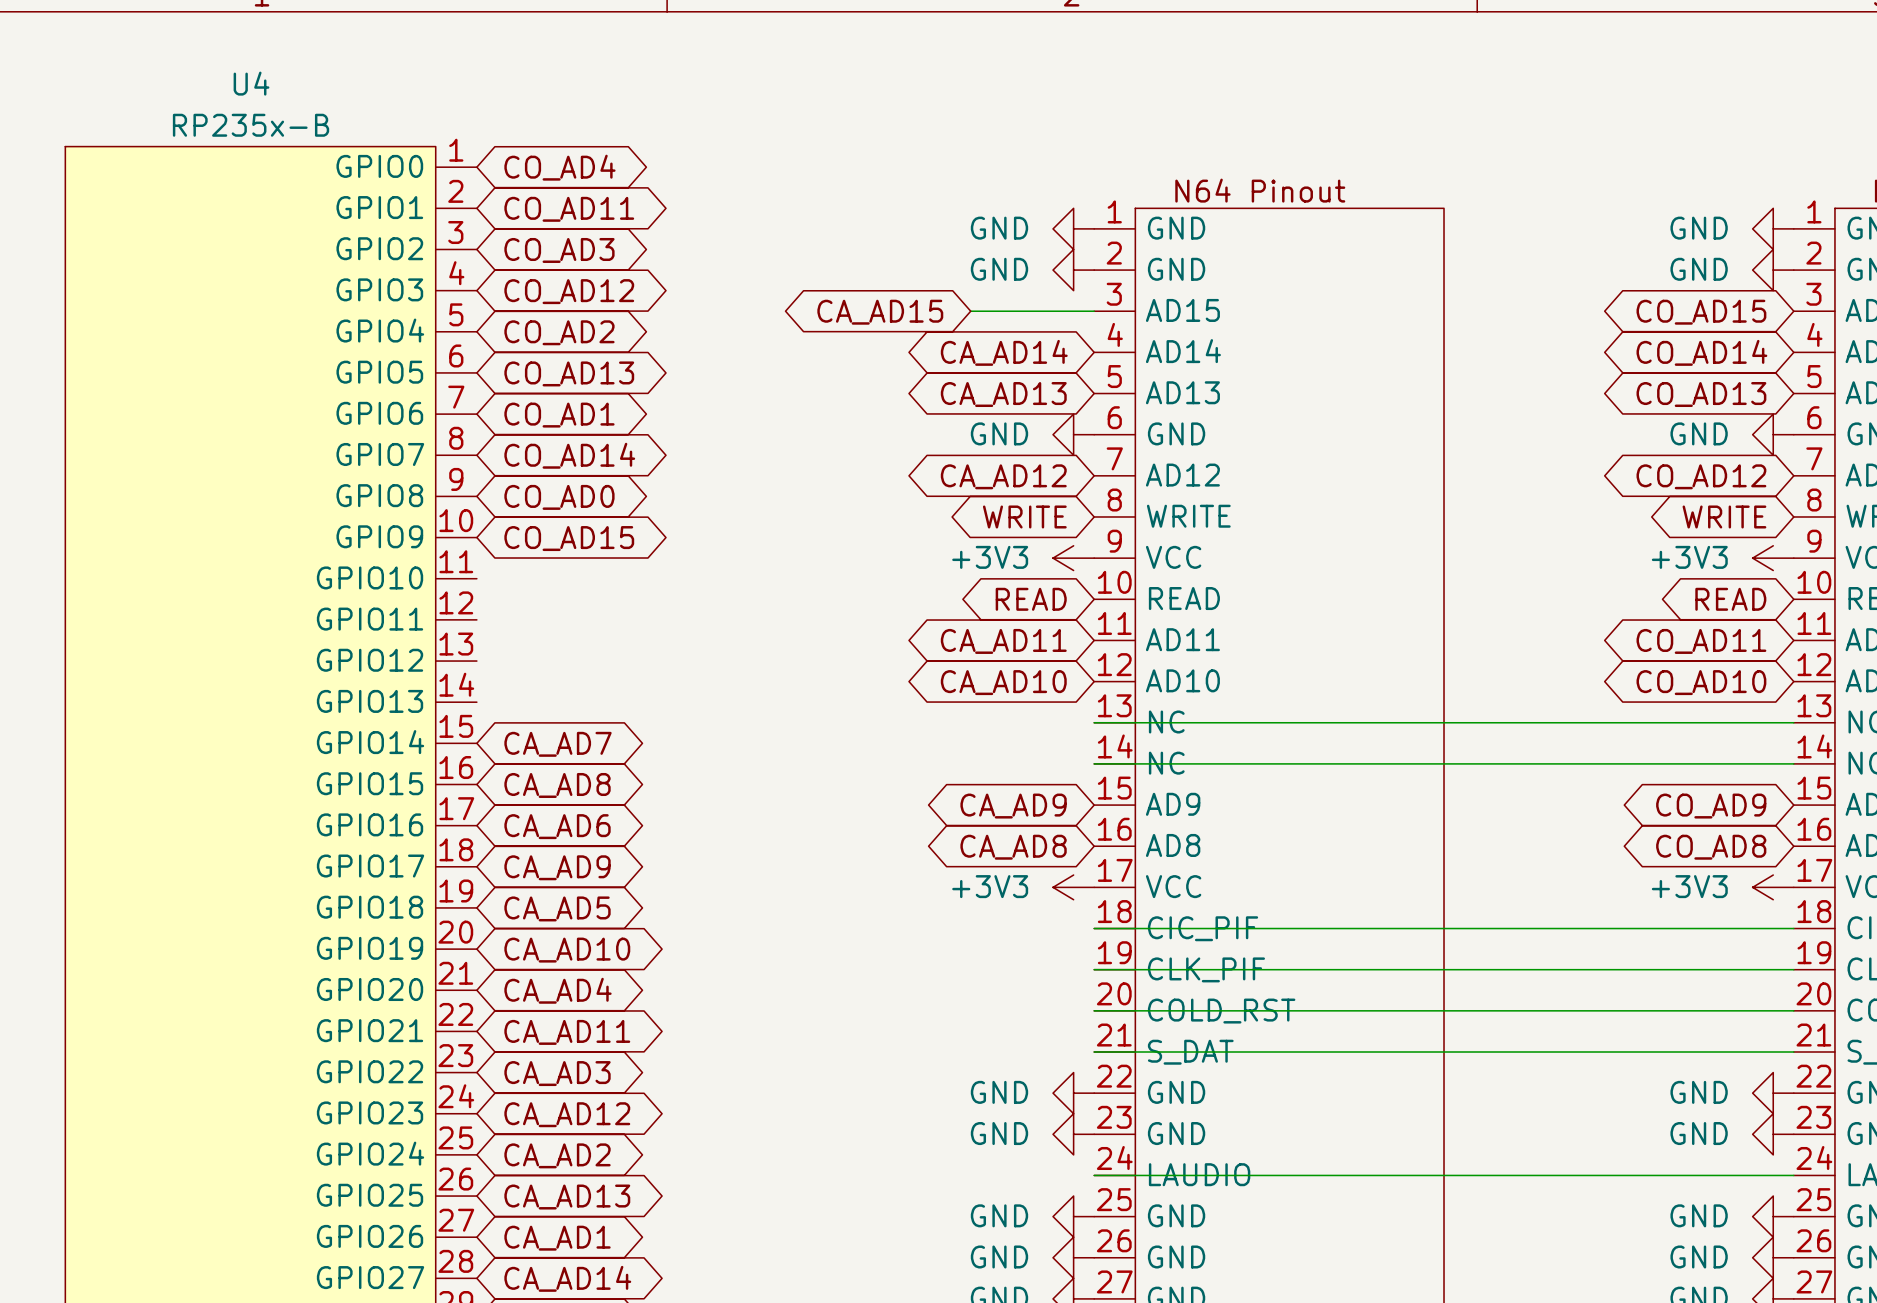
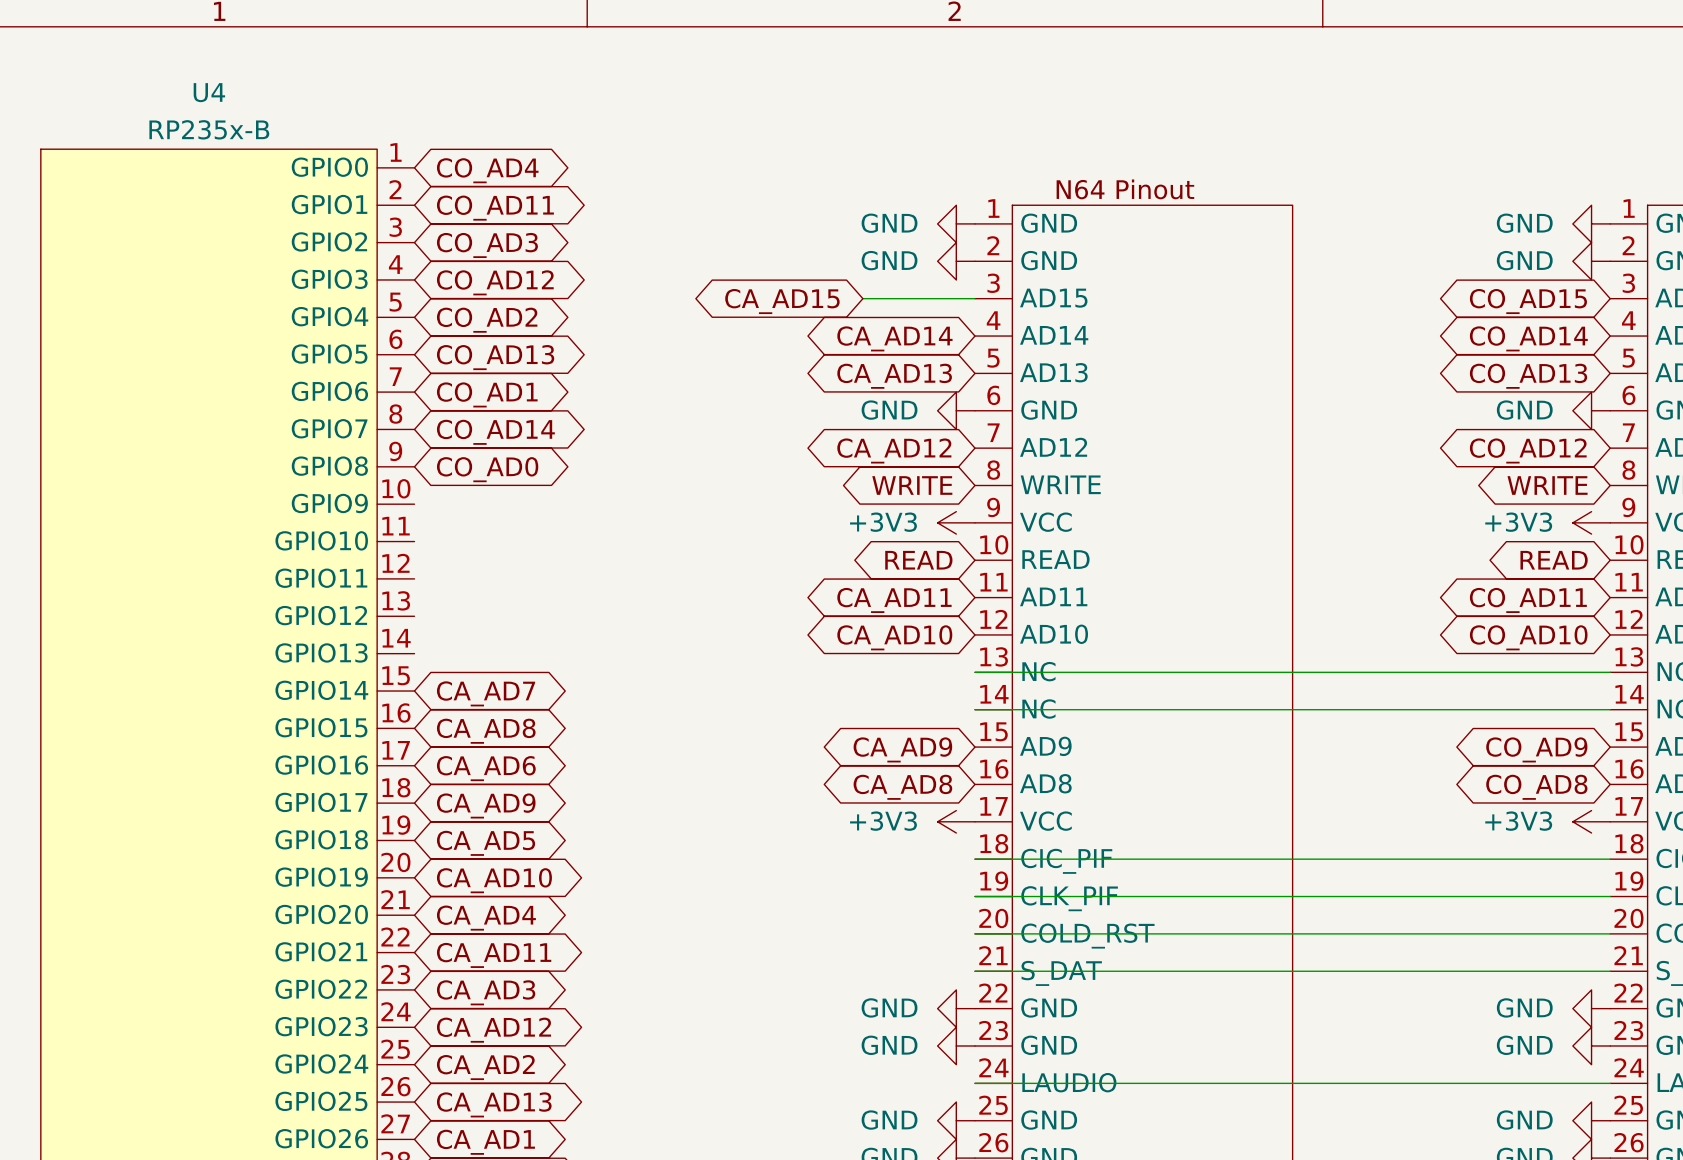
global label: CO_AD15 (569, 538) -> none

